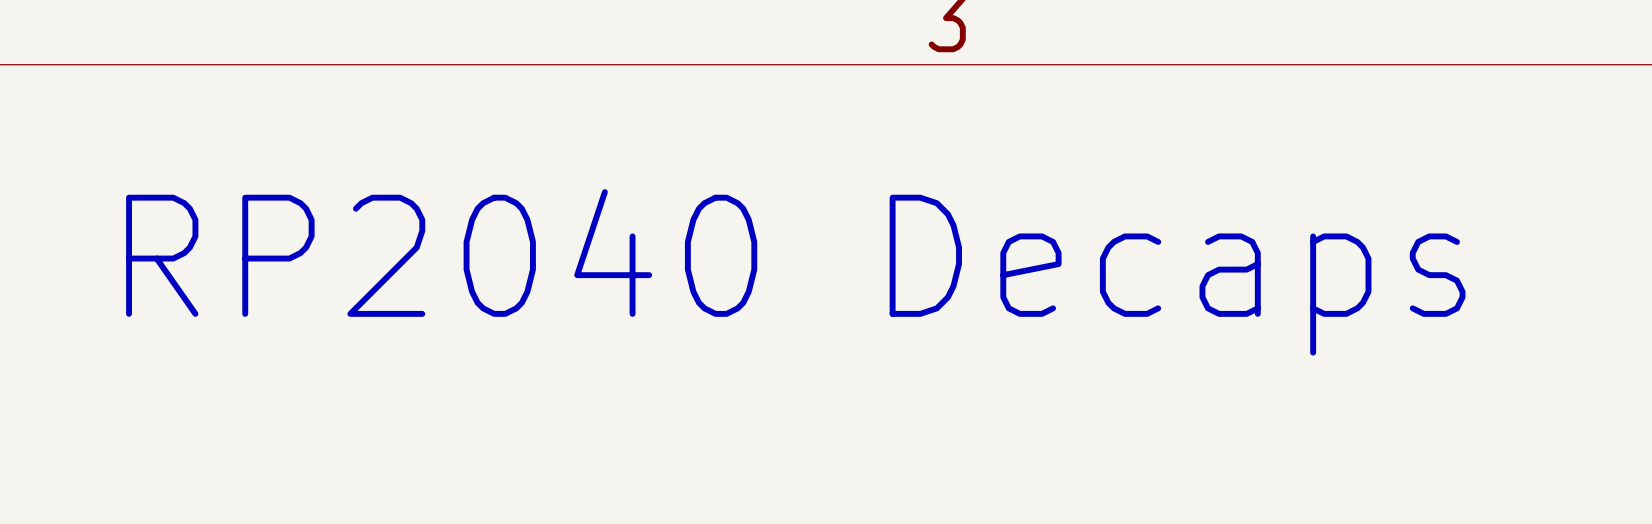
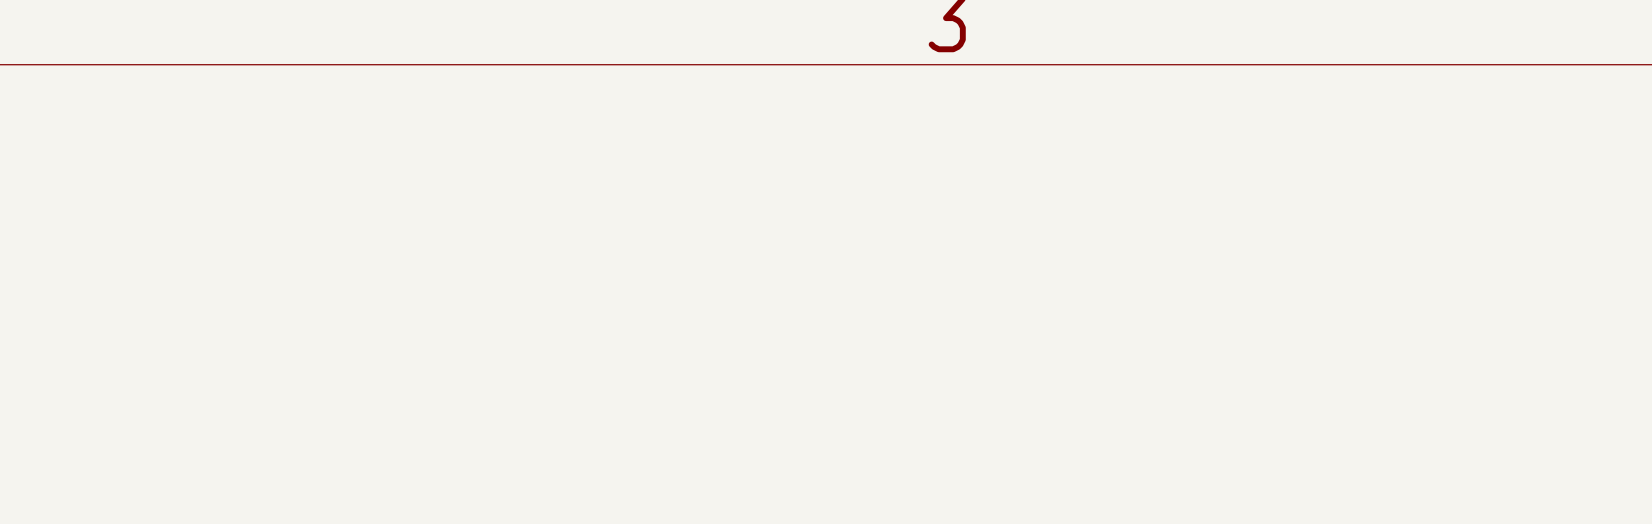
text: RP2040 Decaps (795, 272) -> none

